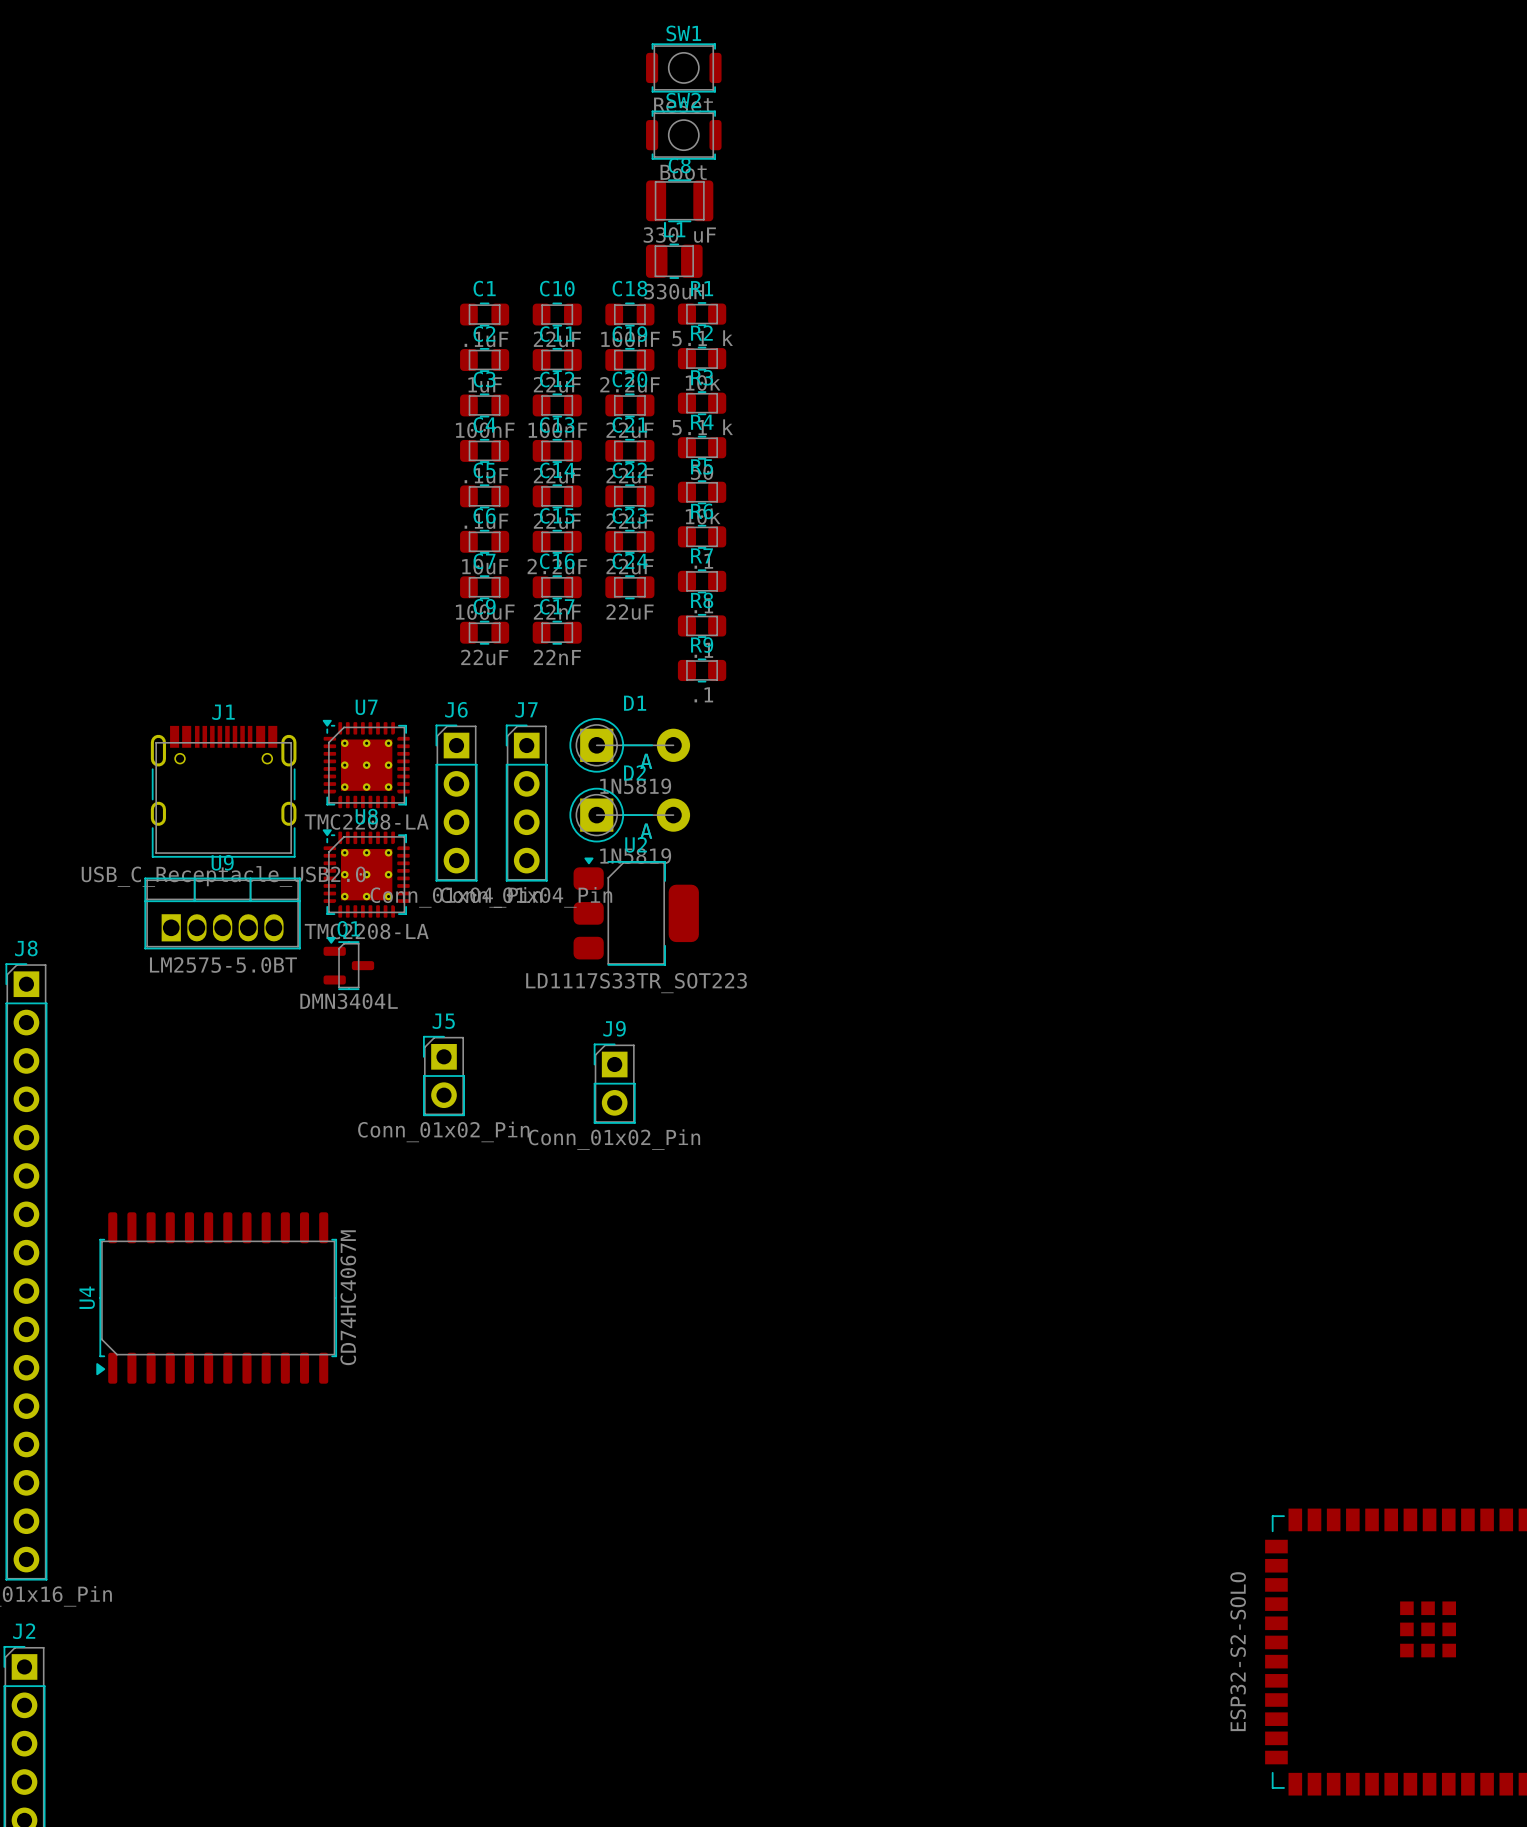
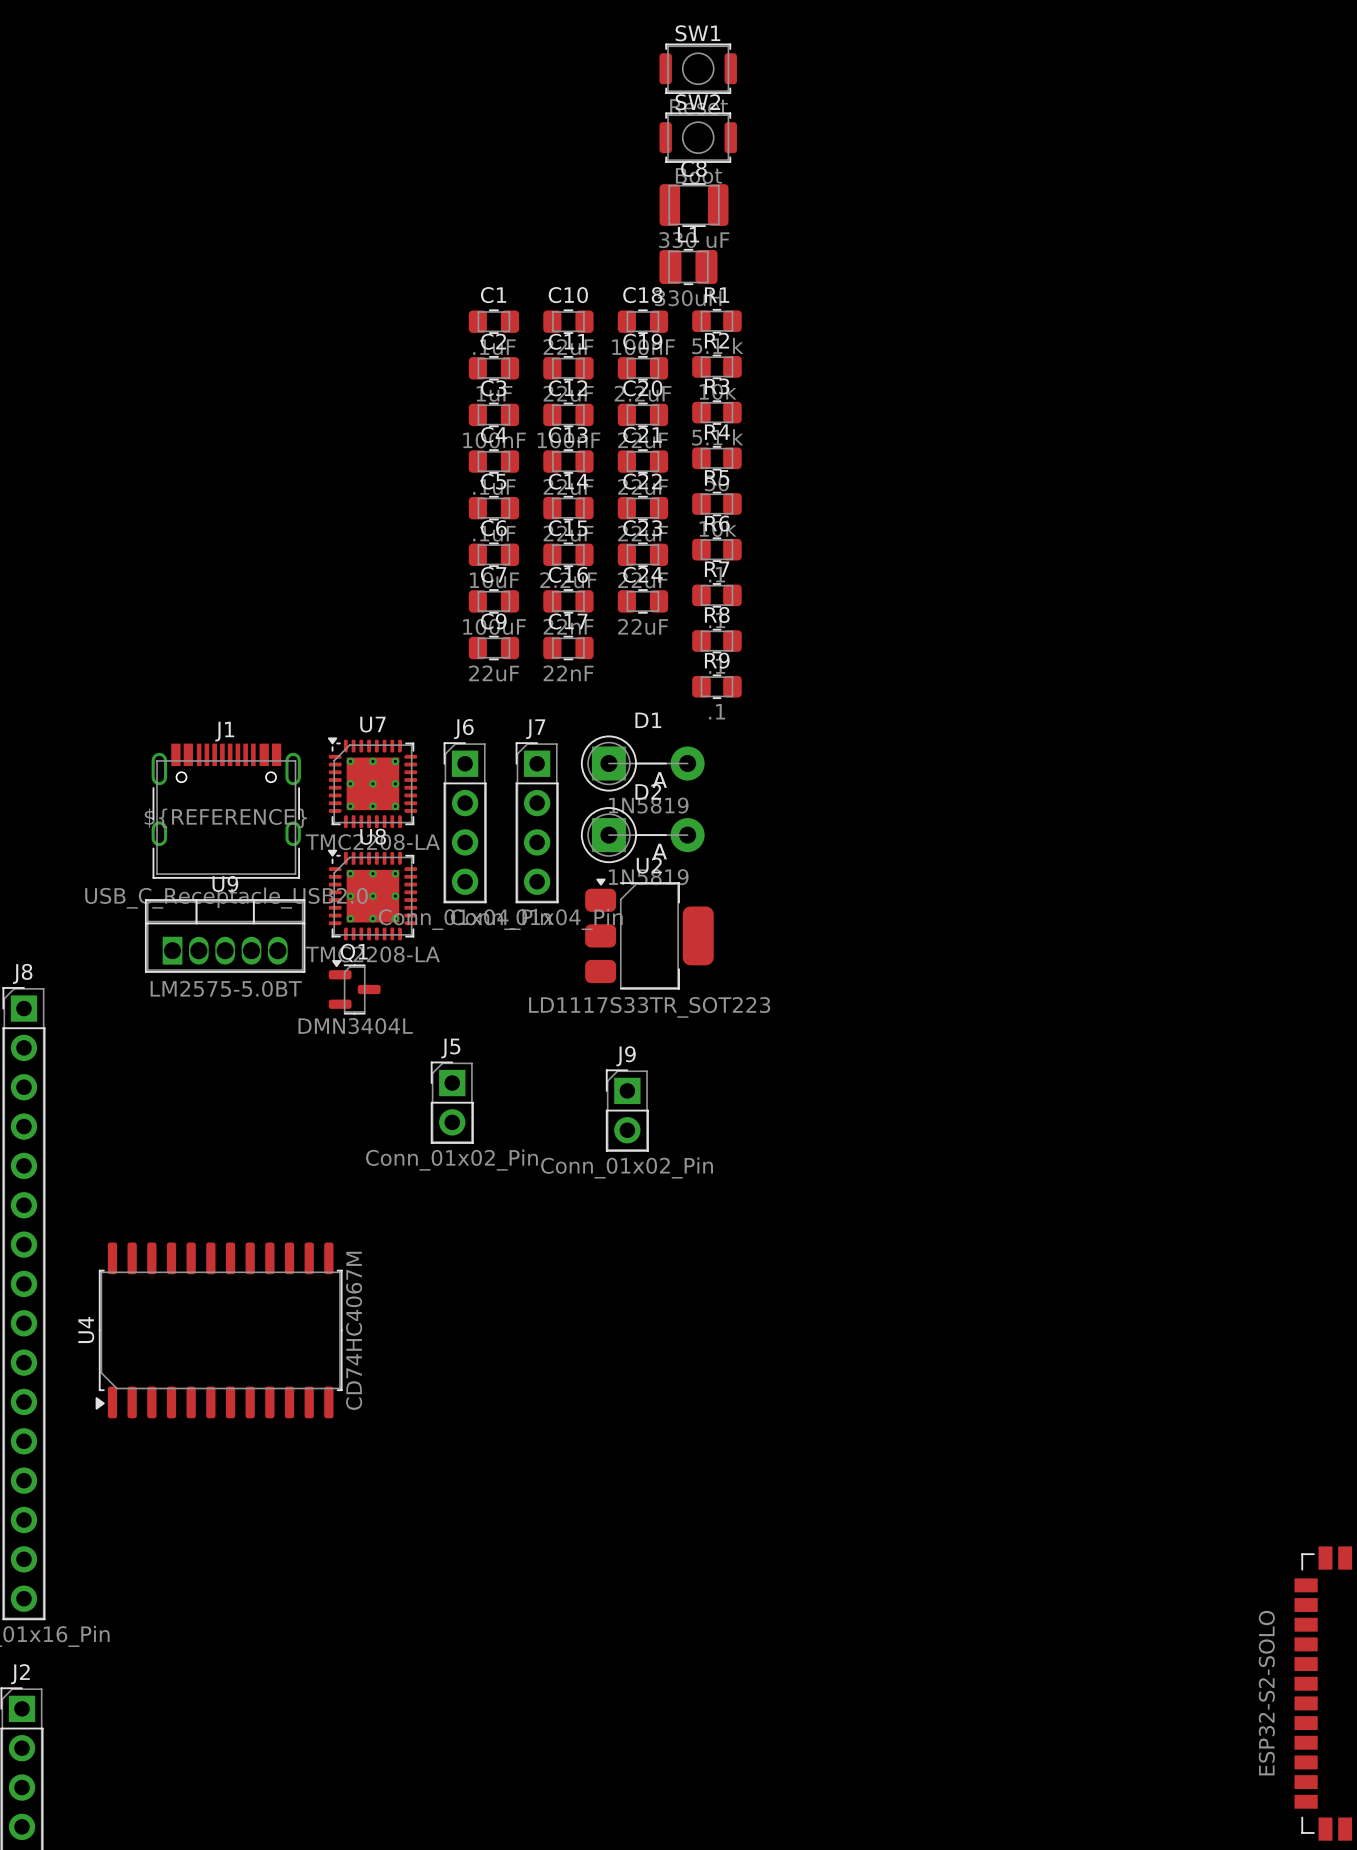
text: none -> ${REFERENCE} (225, 818)

